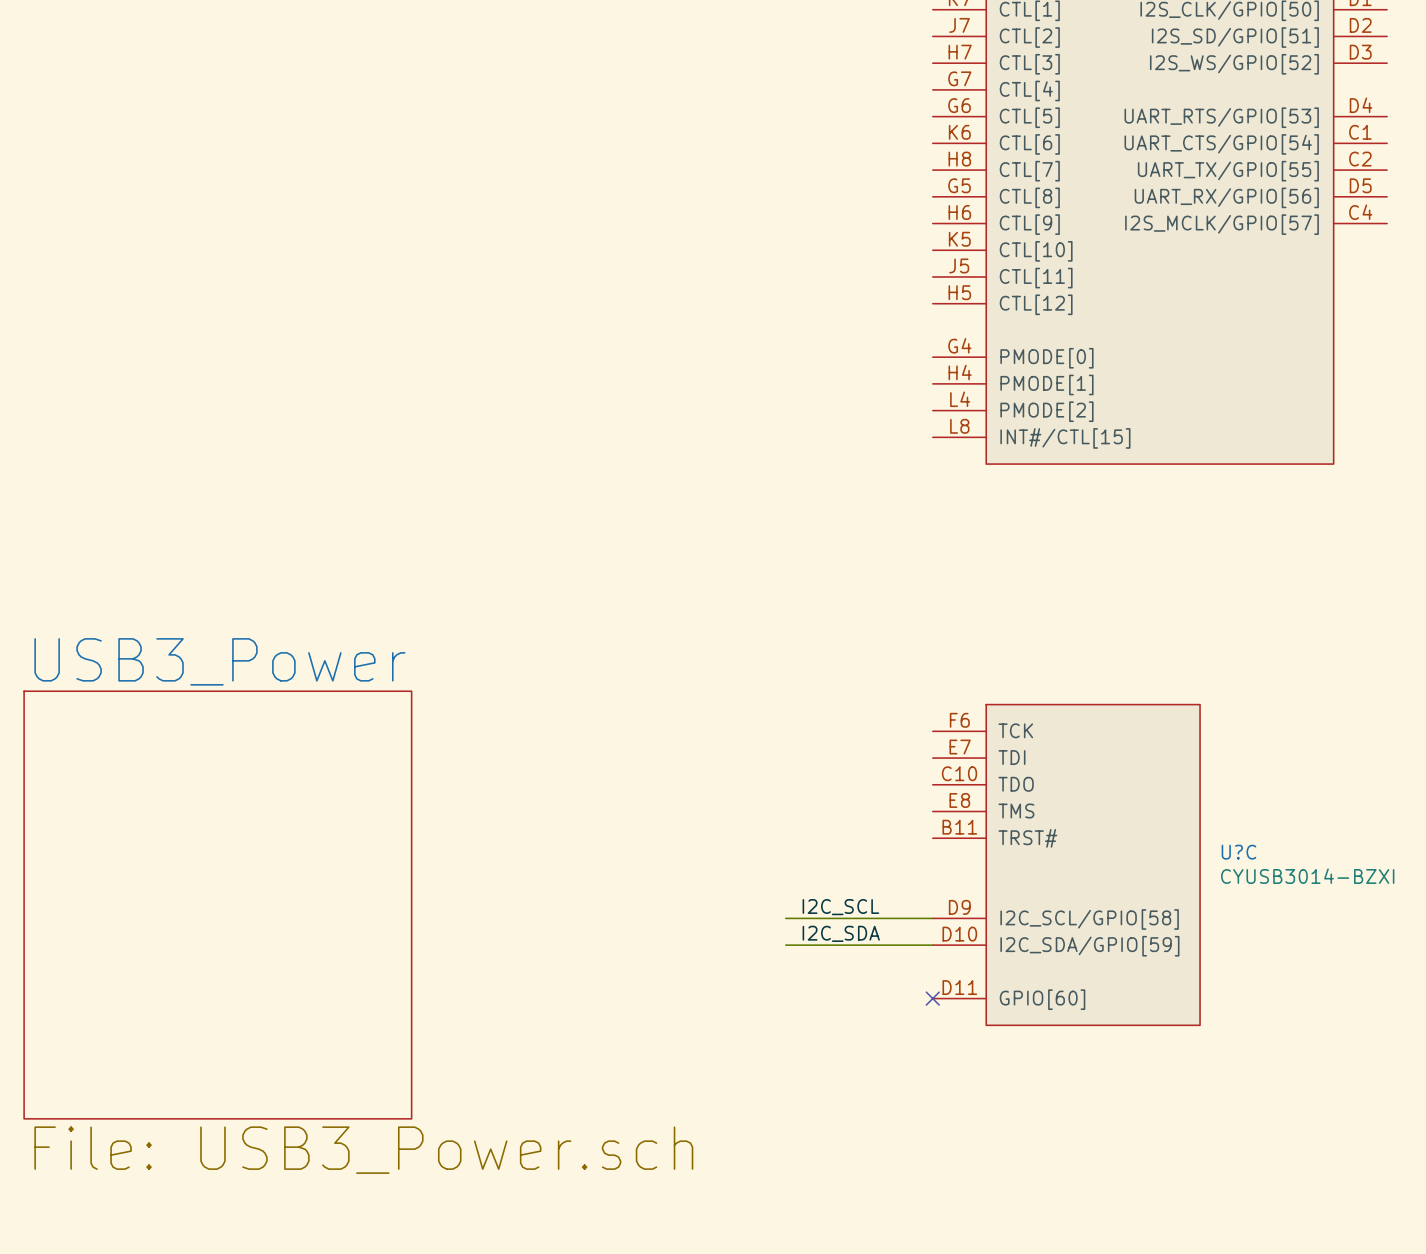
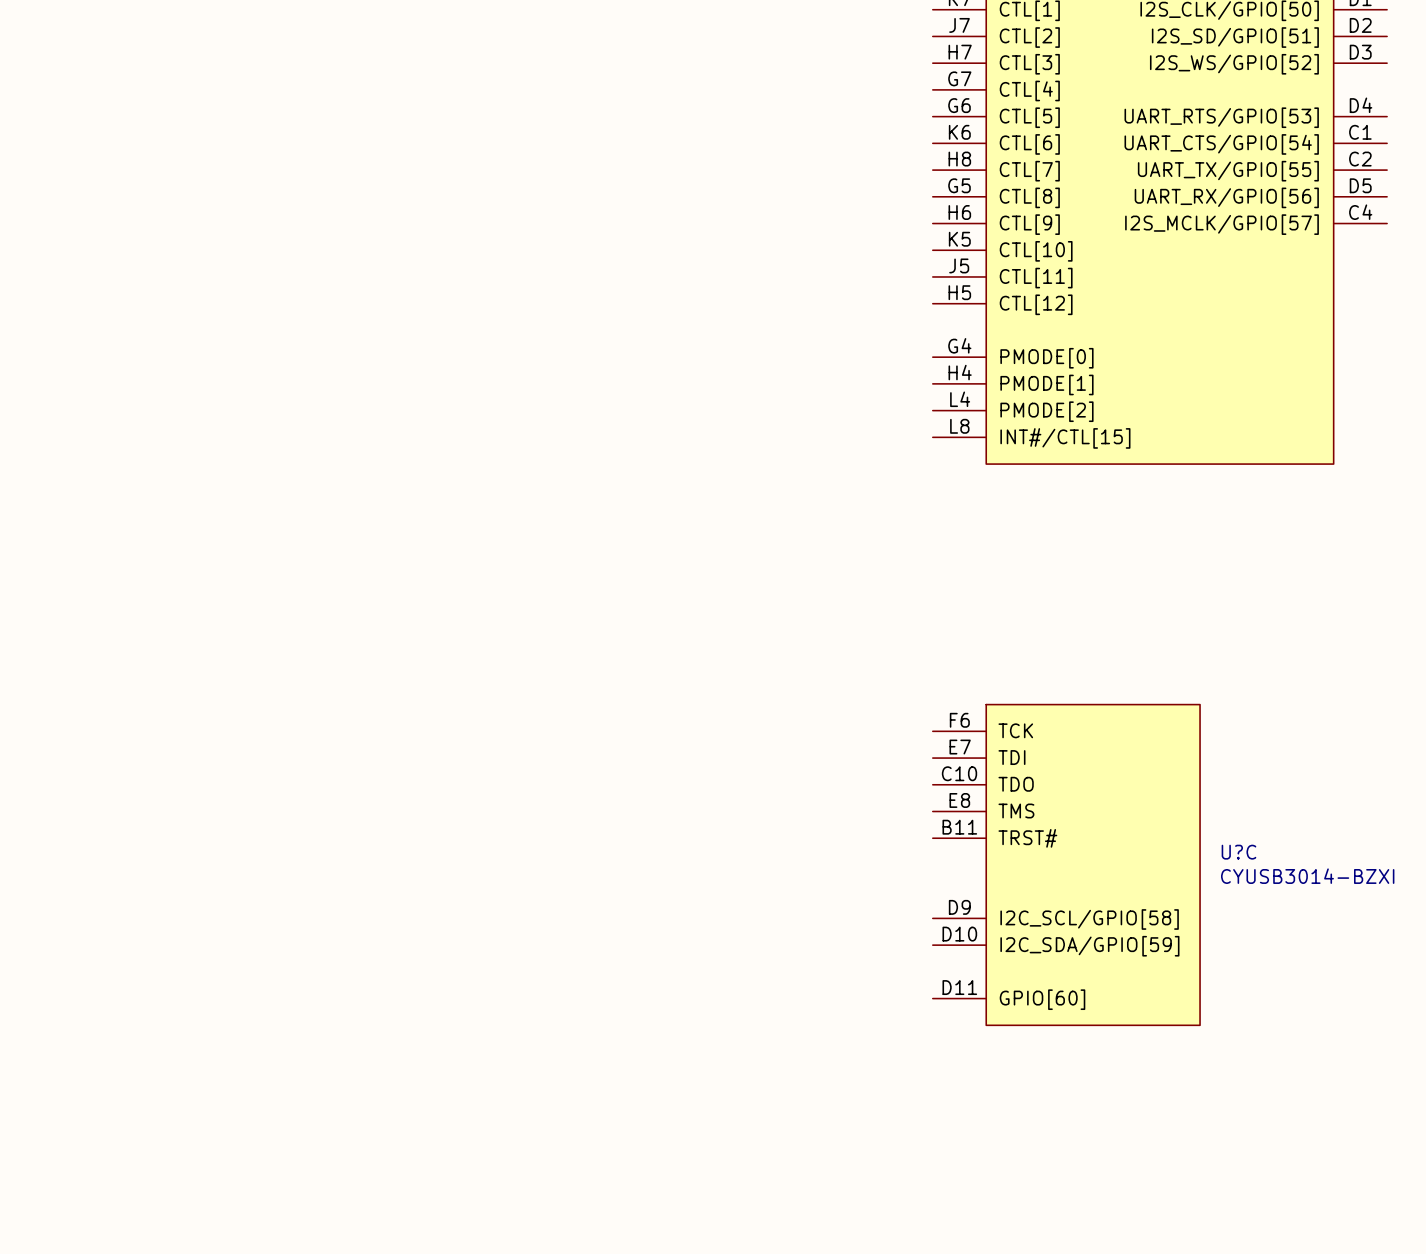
sheet USB3_Power: File: USB3_Power.sch (217, 905) -> none
label: I2C_SCL (840, 907) -> none
wire: (785, 918) (932, 918) -> none
label: I2C_SDA (841, 933) -> none
wire: (785, 945) (932, 945) -> none
no-connect mark: (932, 998) -> none

